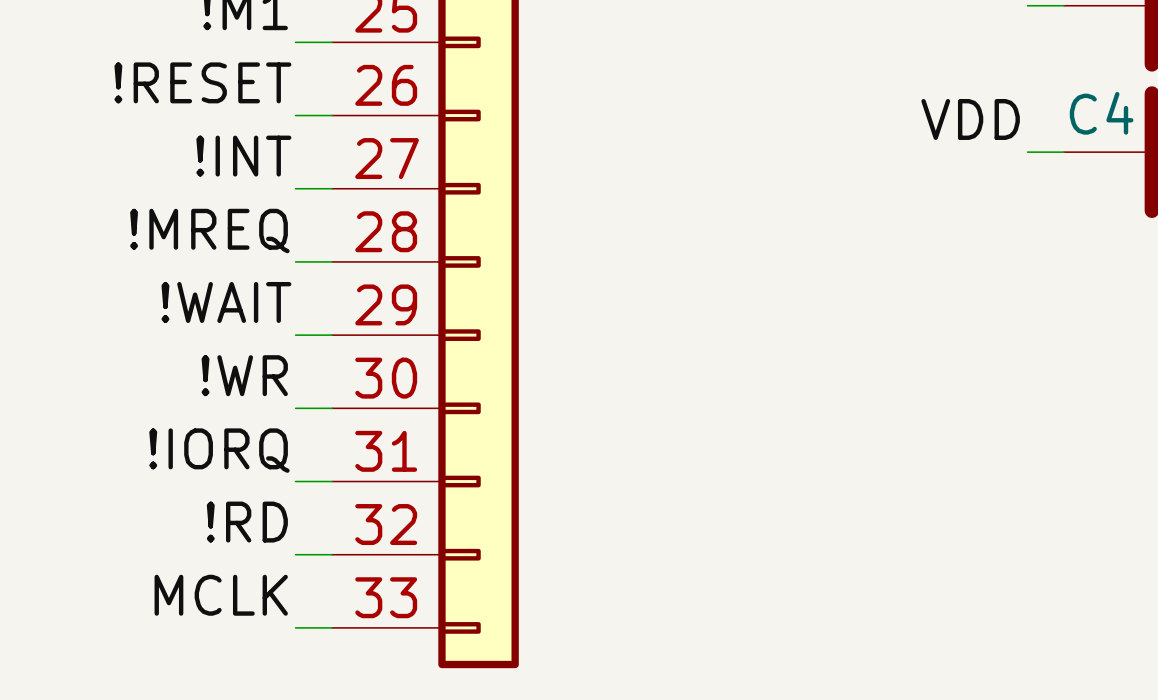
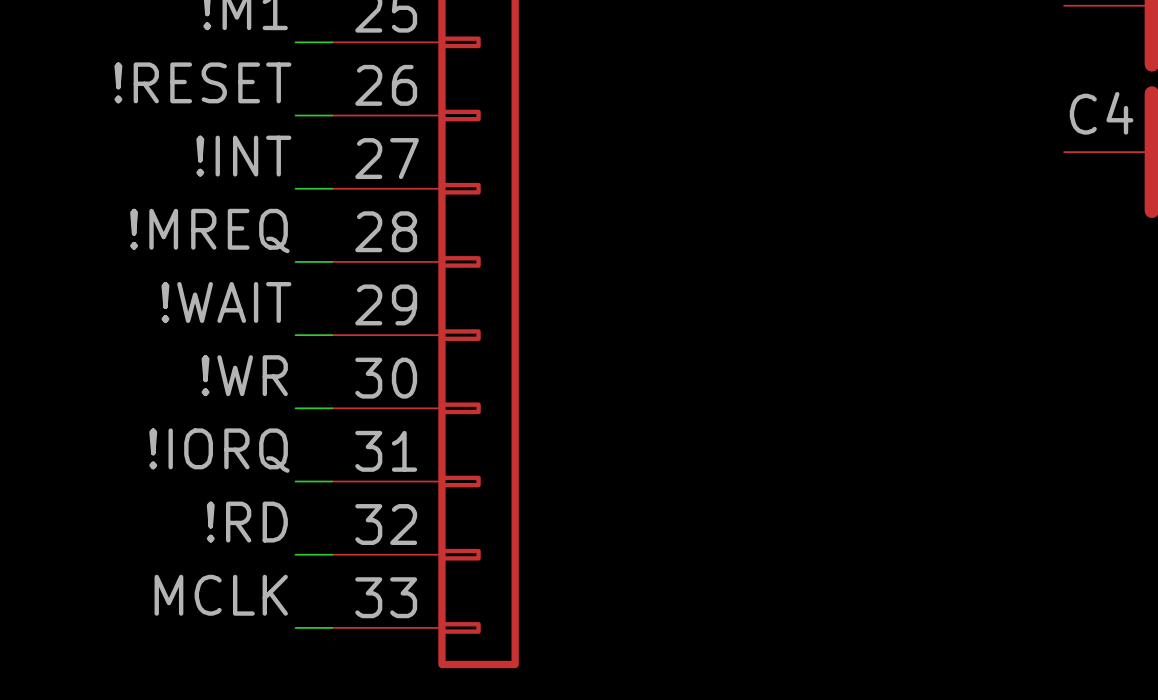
wire: (1027, 5) (1064, 5) -> none
label: VDD (970, 119) -> none
wire: (1027, 152) (1064, 152) -> none

